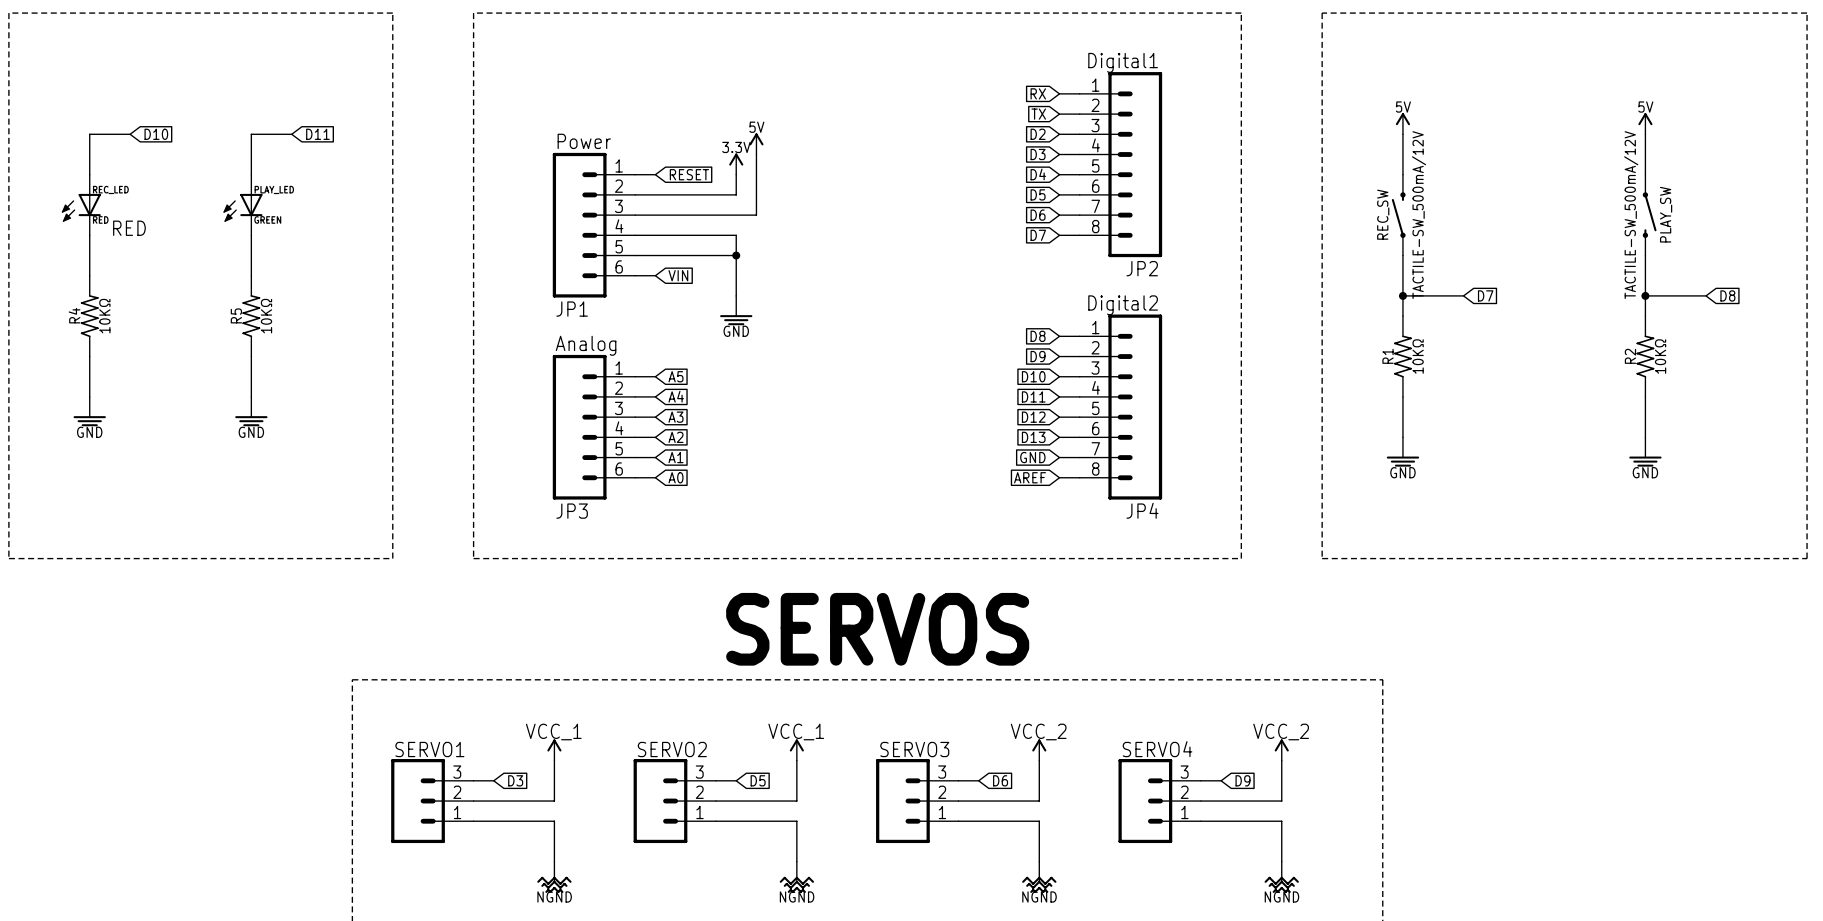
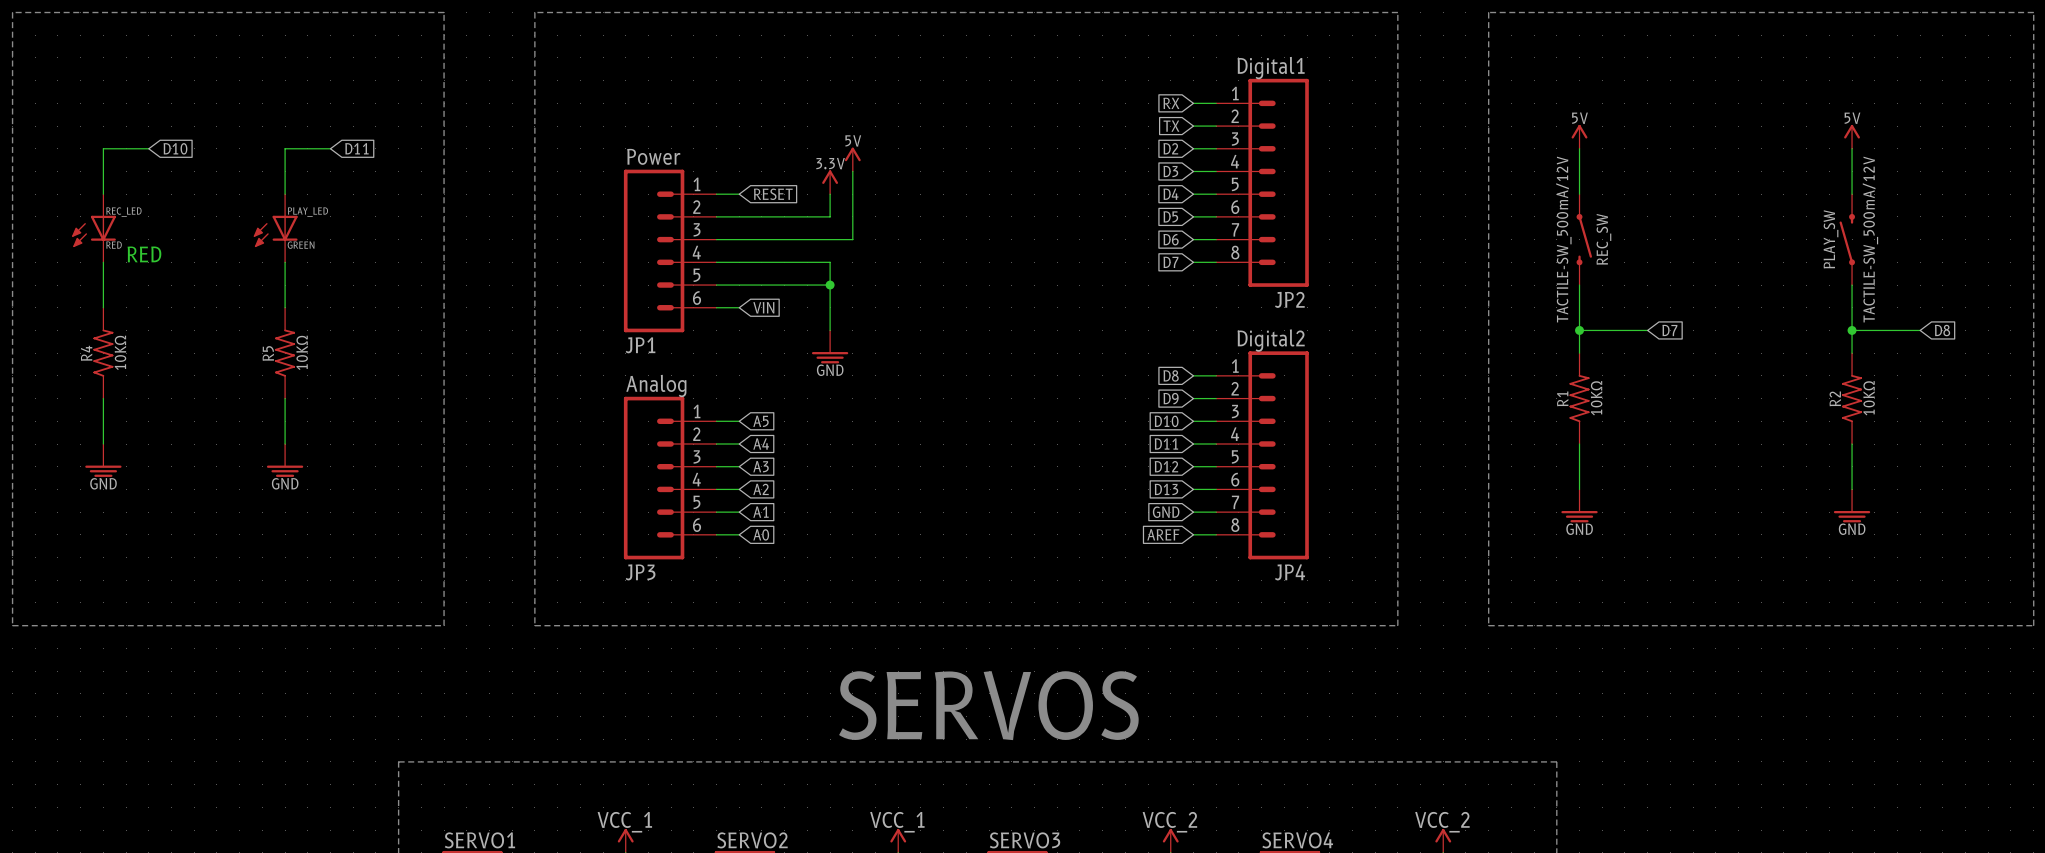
REC_SW rotation: 0° (1398, 215) -> 180° (1584, 239)
PLAY_SW rotation: 0° (1649, 215) -> 180° (1847, 239)

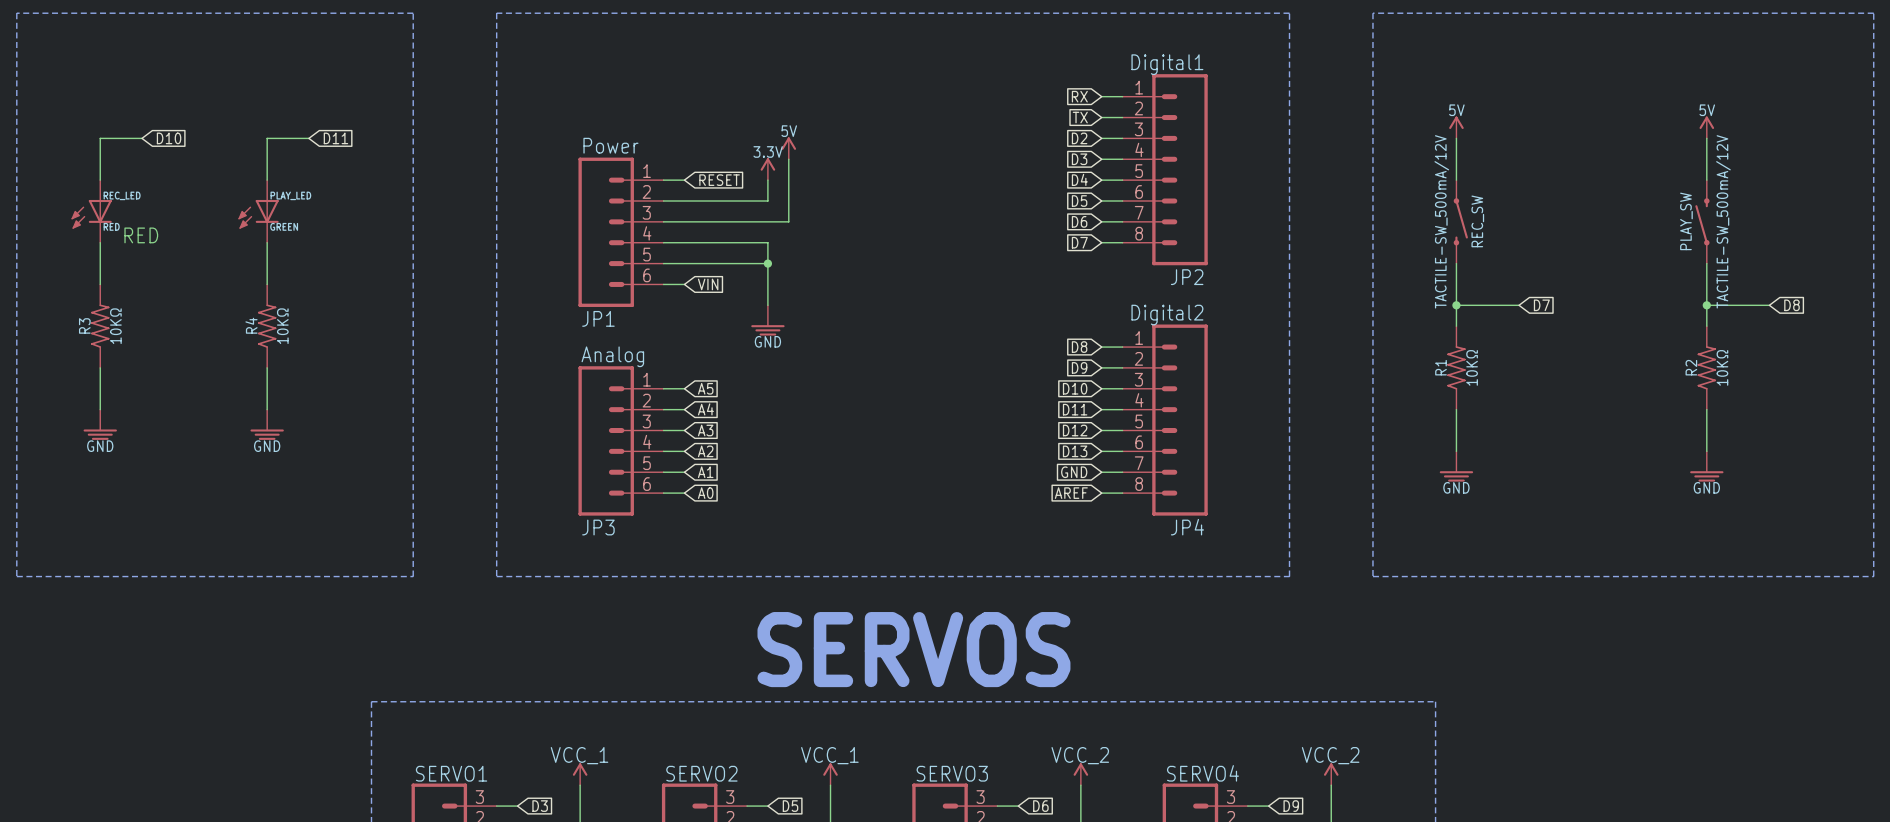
R4 name: R4 (86, 353) -> R3 (84, 325)
R5 name: R5 (268, 353) -> R4 (251, 325)

